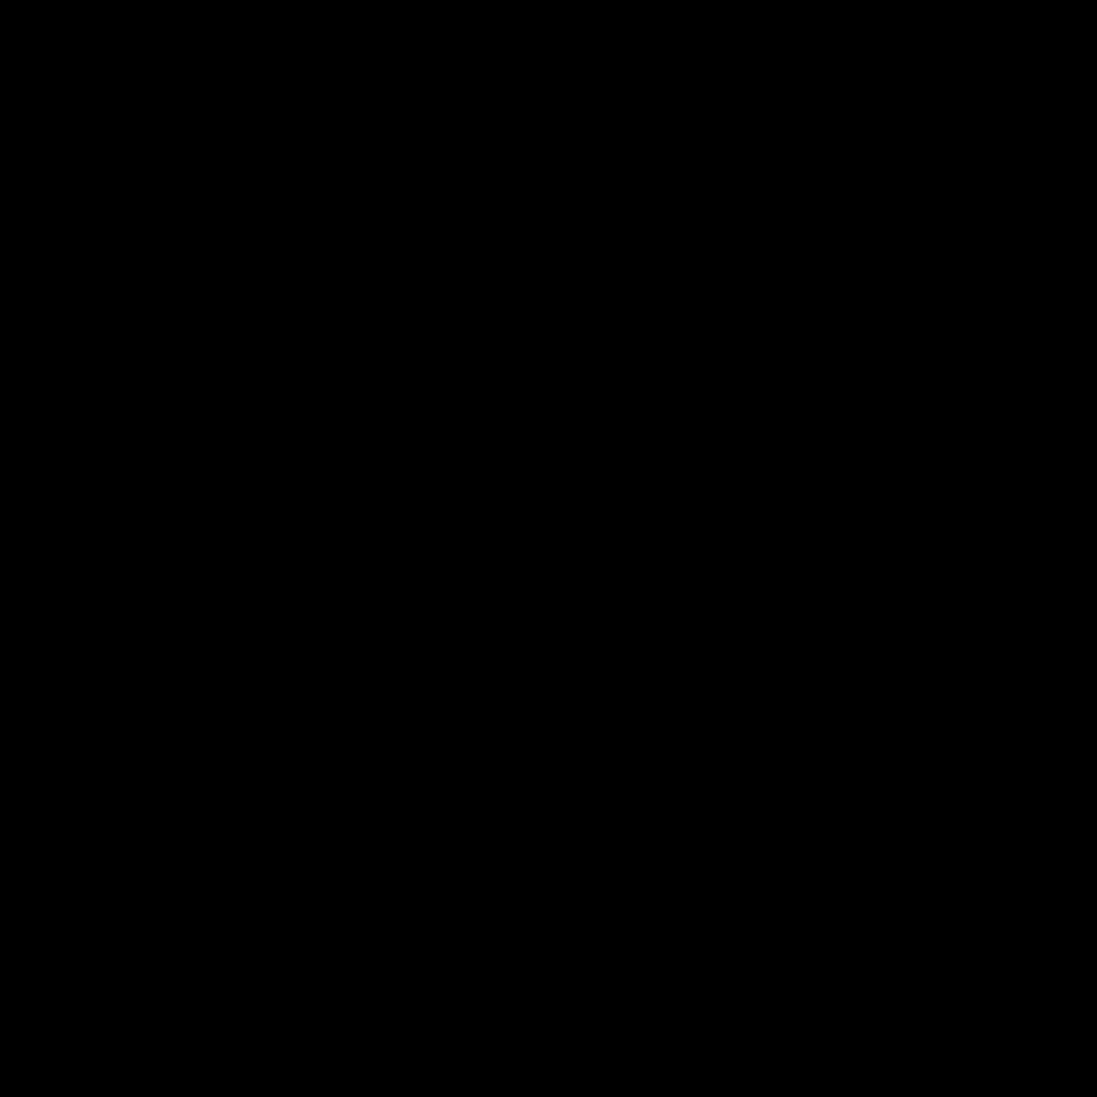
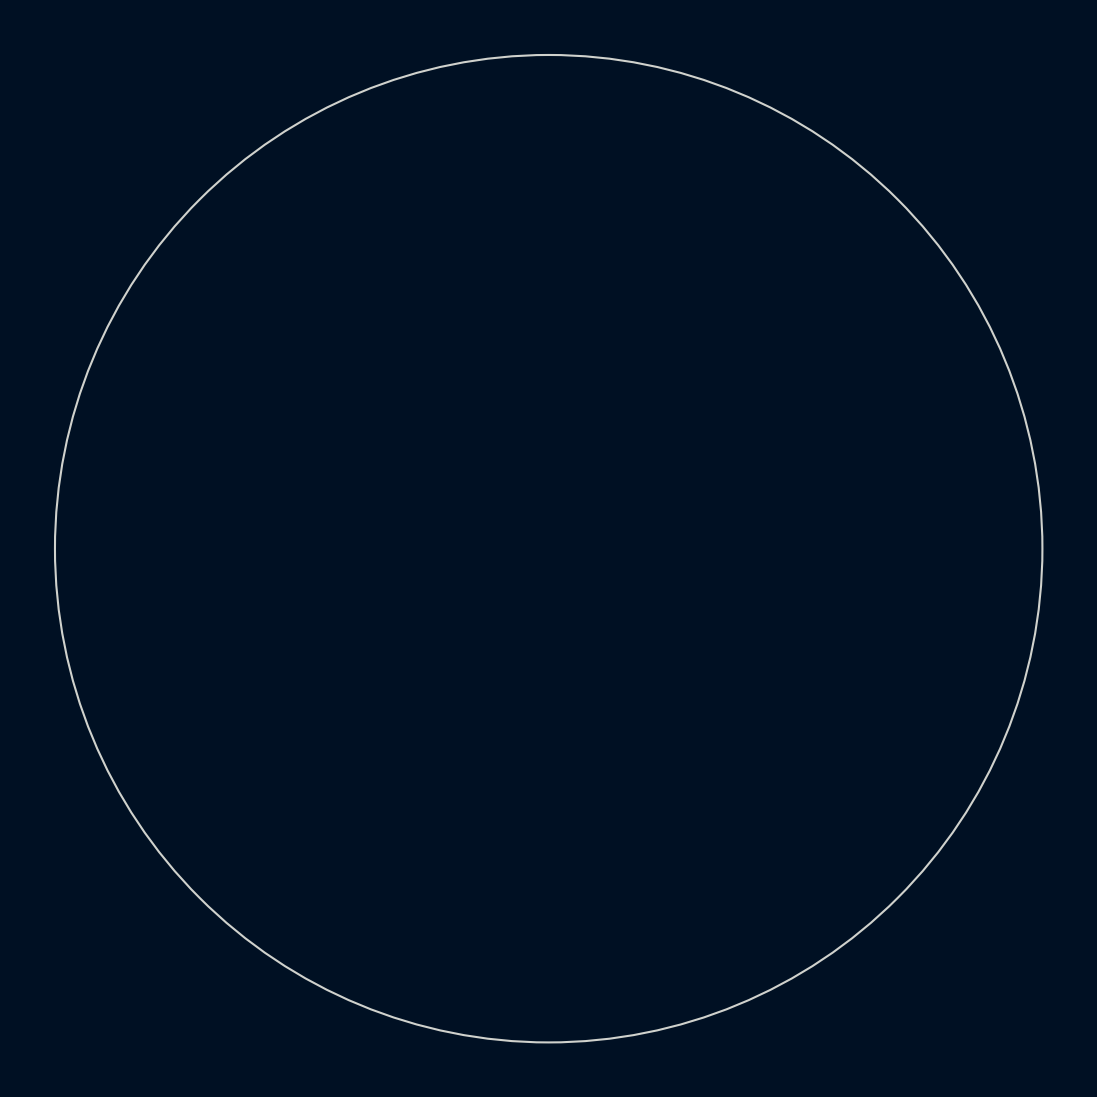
round board edge: none -> [53, 53, 1044, 1044]

